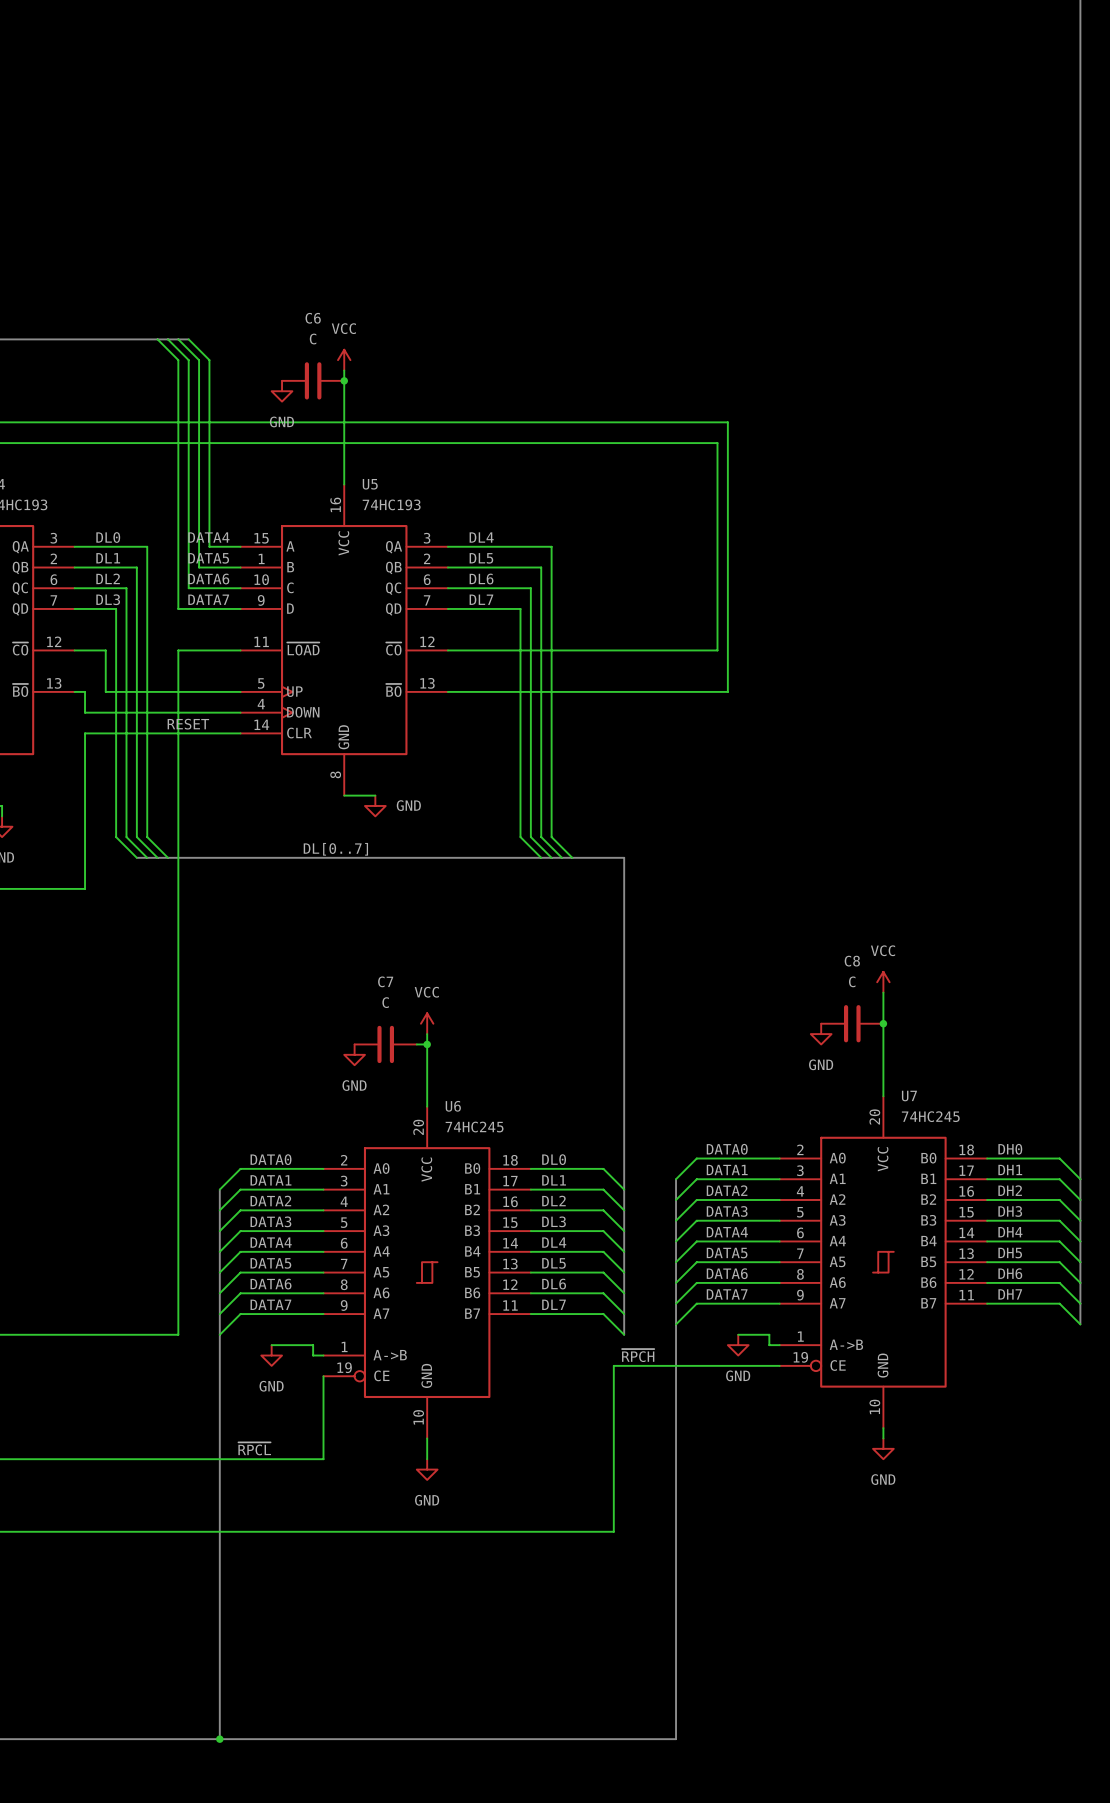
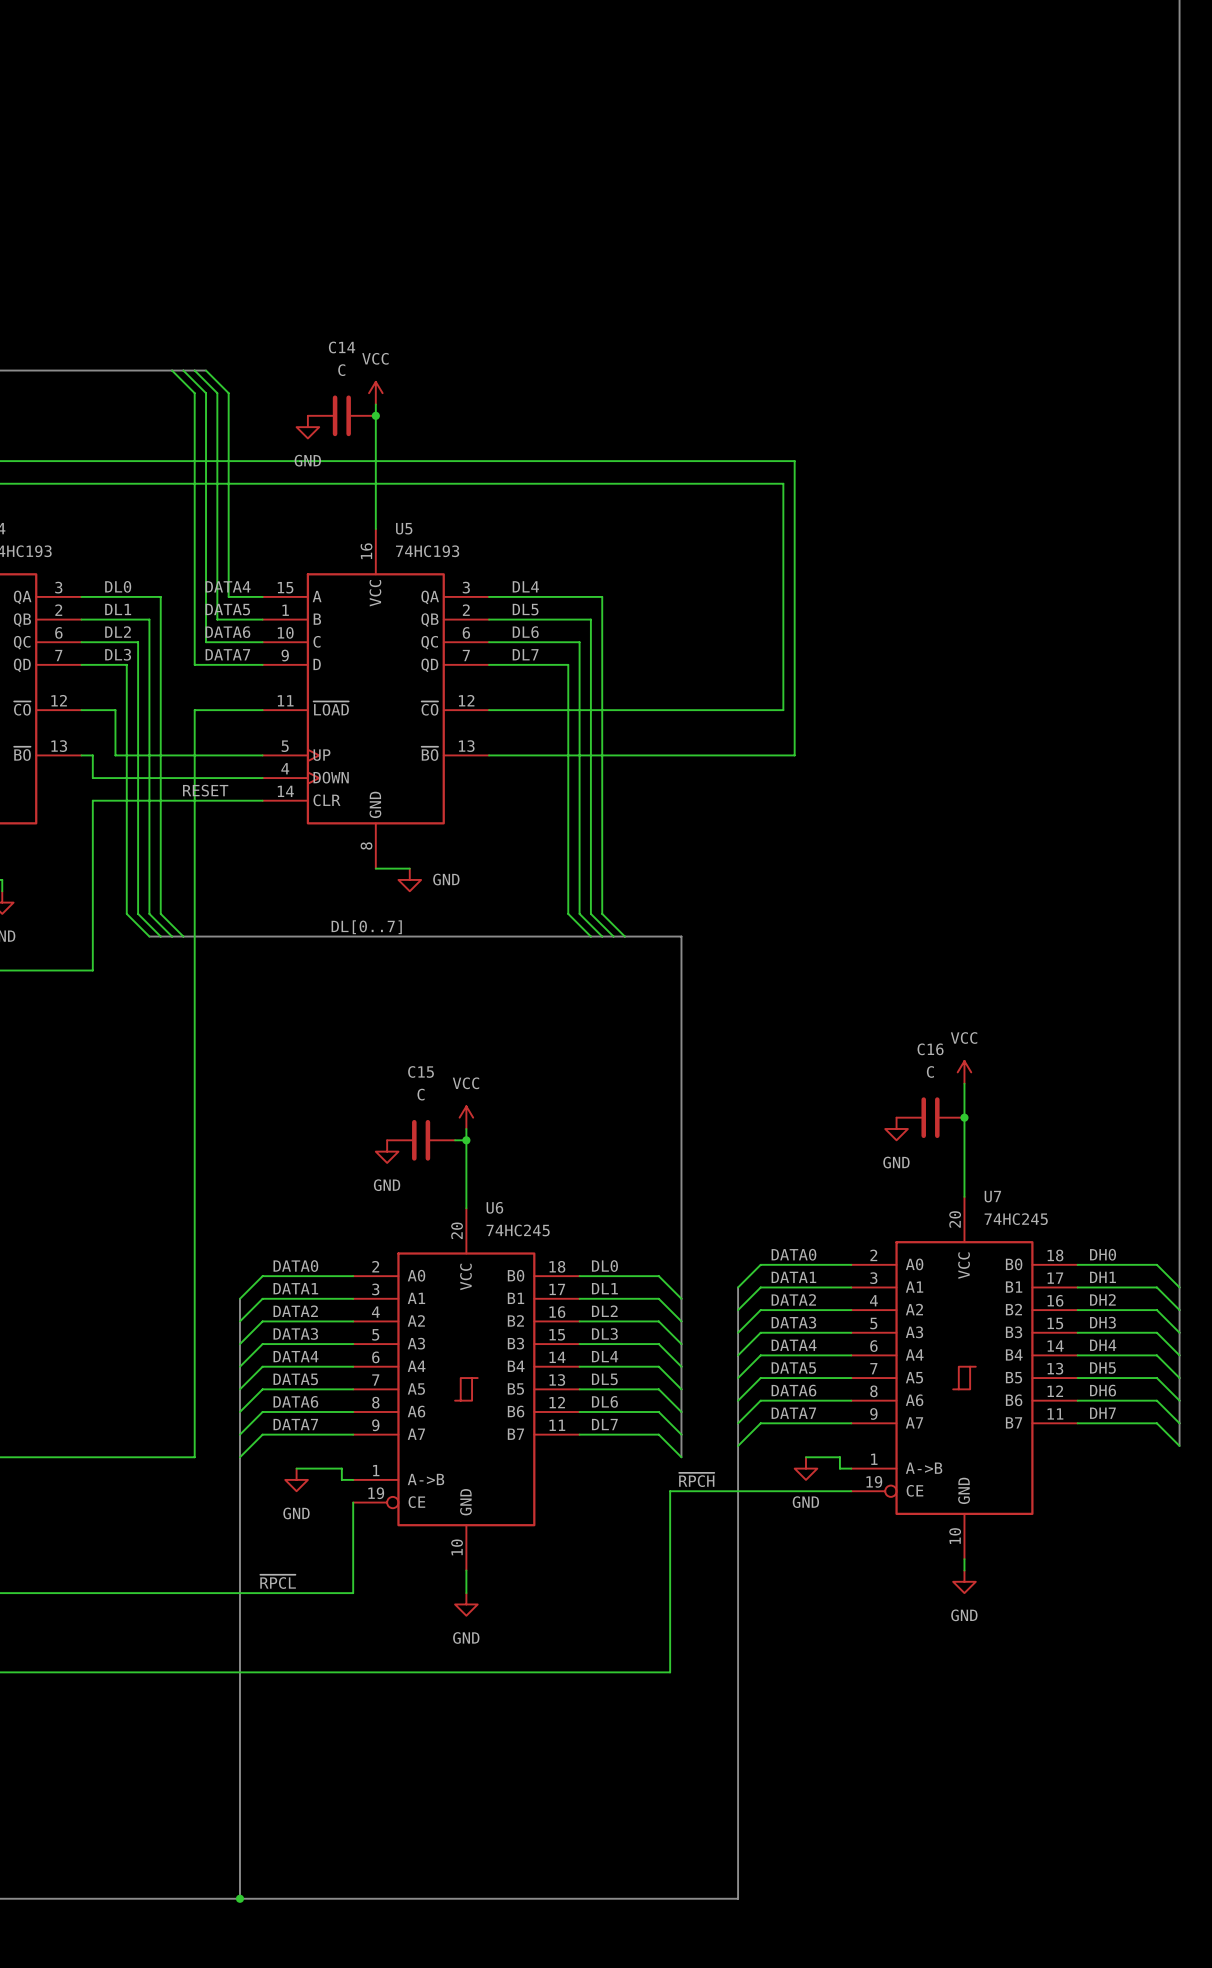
C6 name: C6 (313, 318) -> C14 (342, 347)
C8 name: C8 (852, 961) -> C16 (930, 1049)
C7 name: C7 (385, 981) -> C15 (421, 1071)

